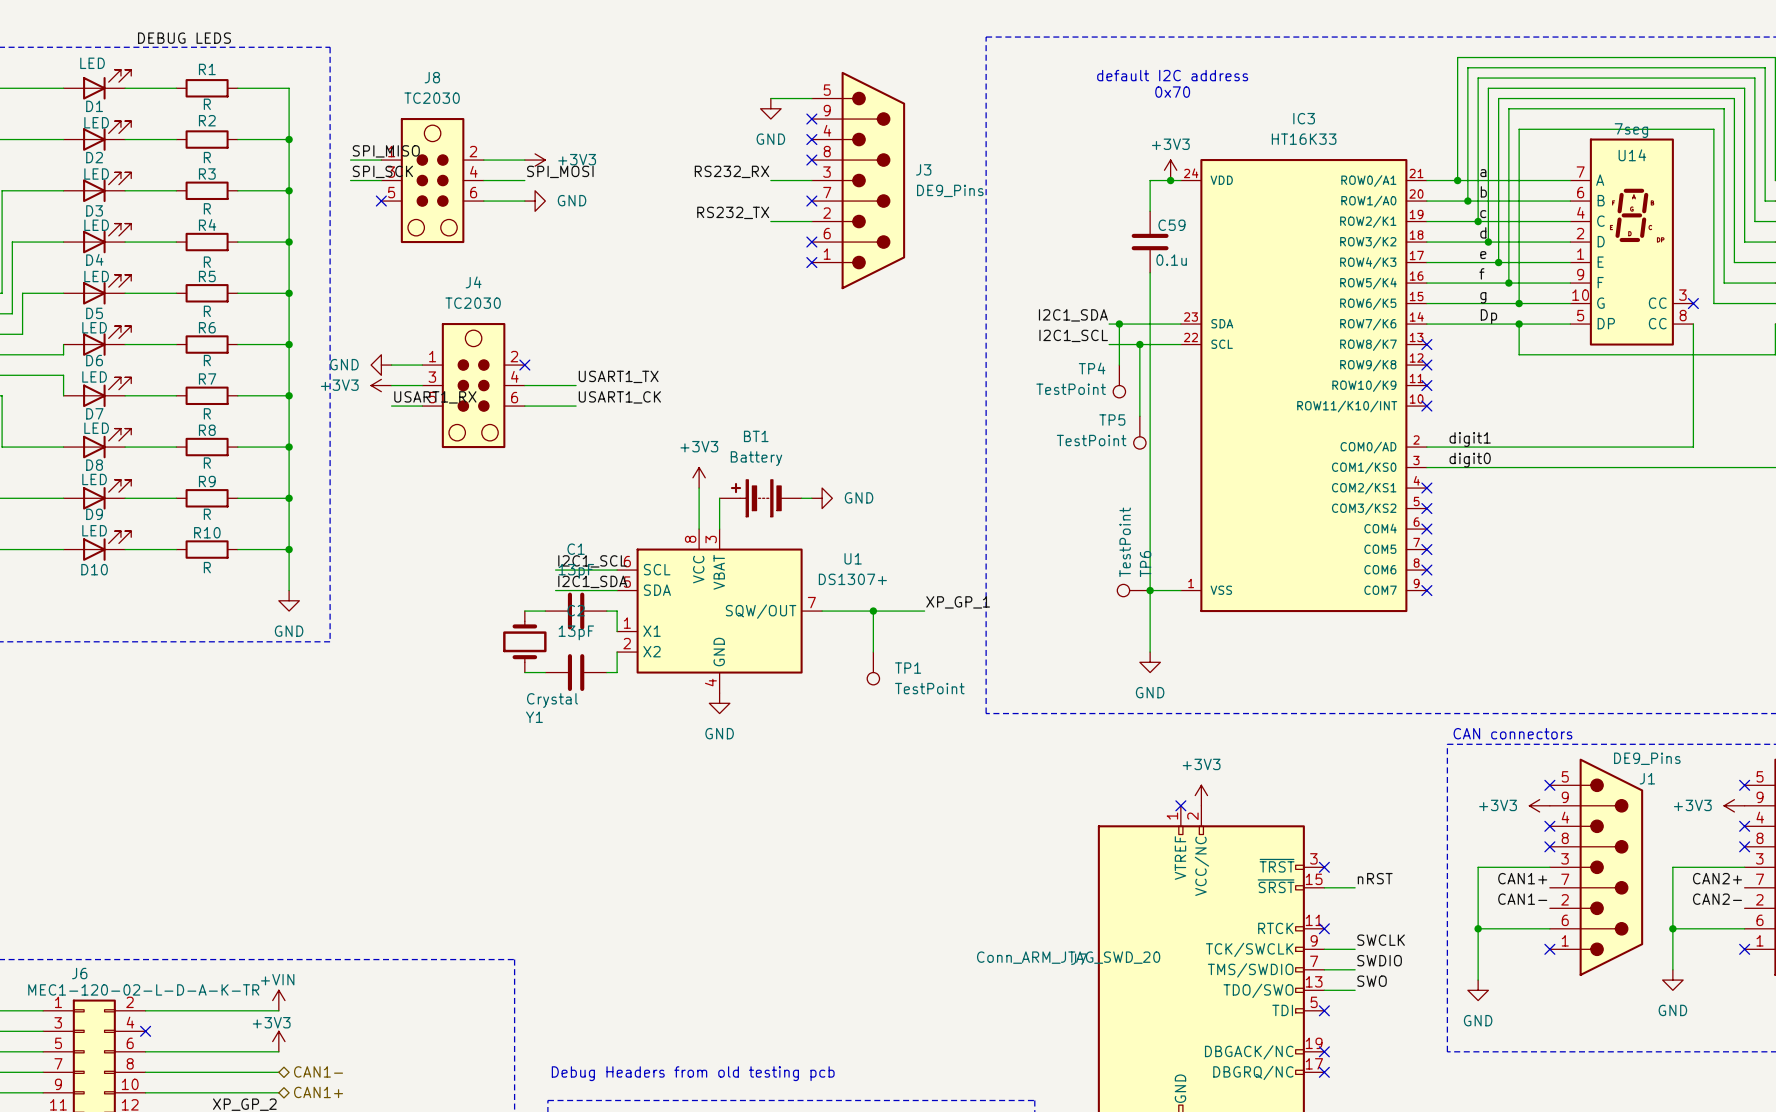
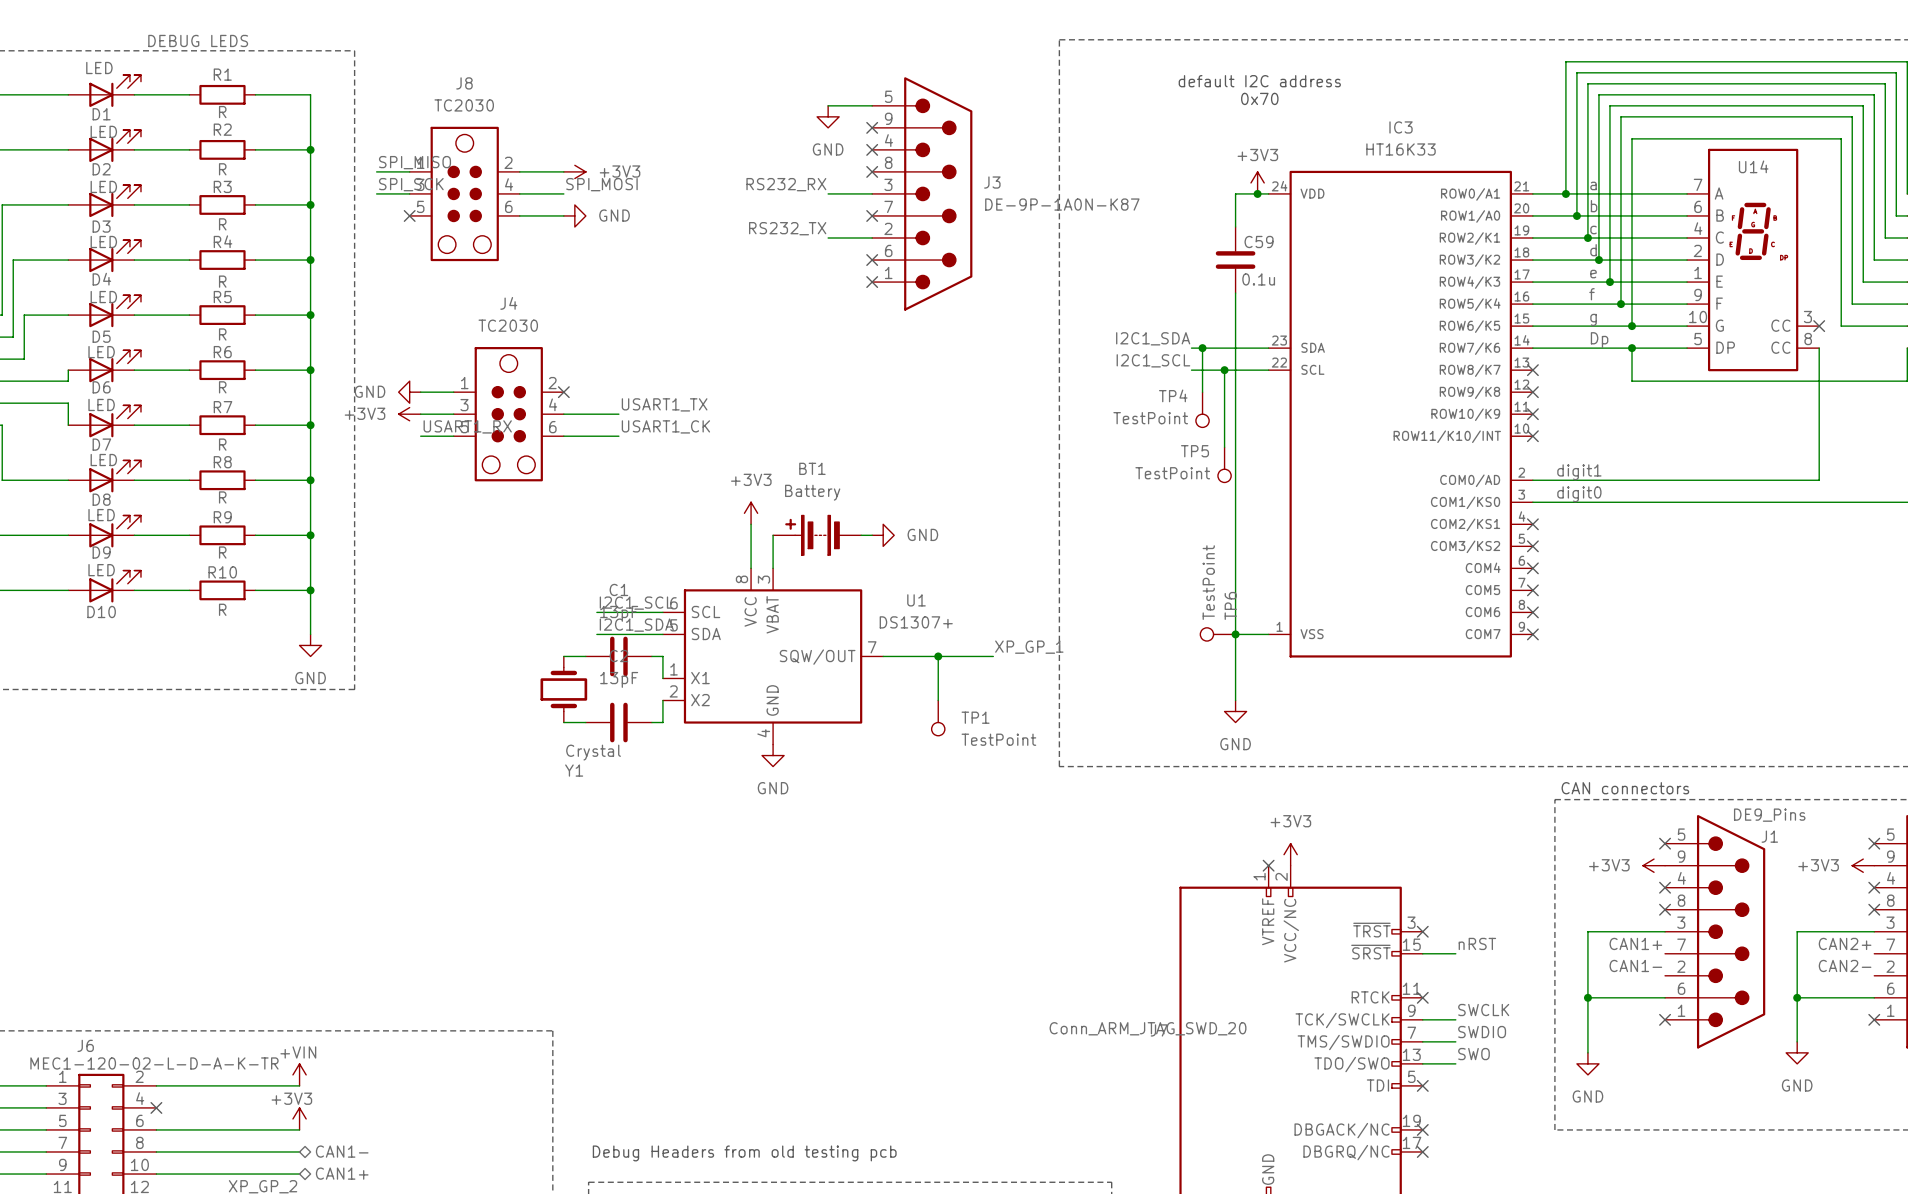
U14 value: 7seg (1631, 130) -> none
J3 value: DE9_Pins (950, 190) -> DE-9P-1A0N-K87 (1062, 204)

